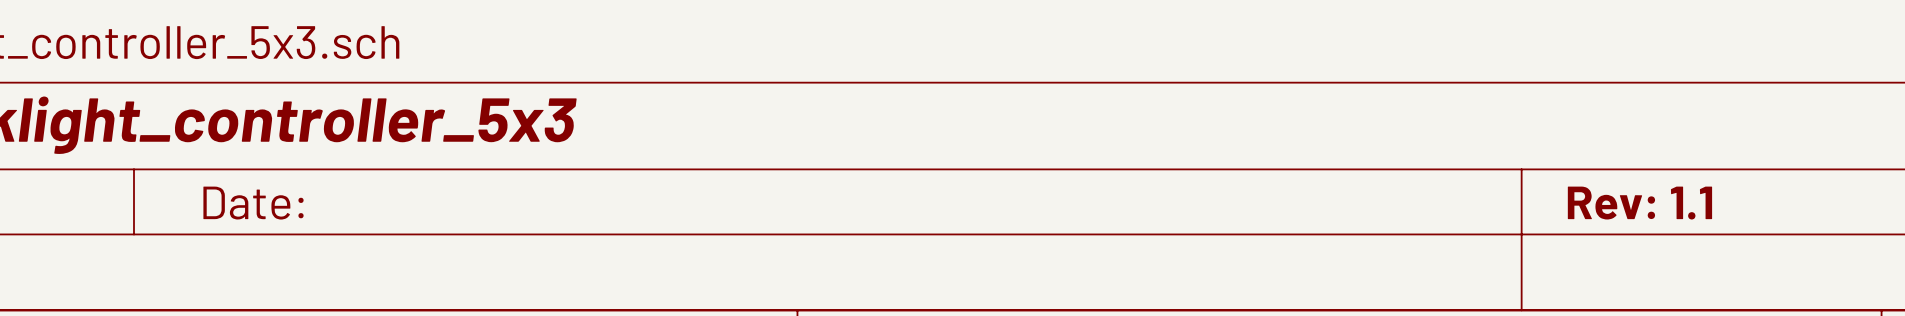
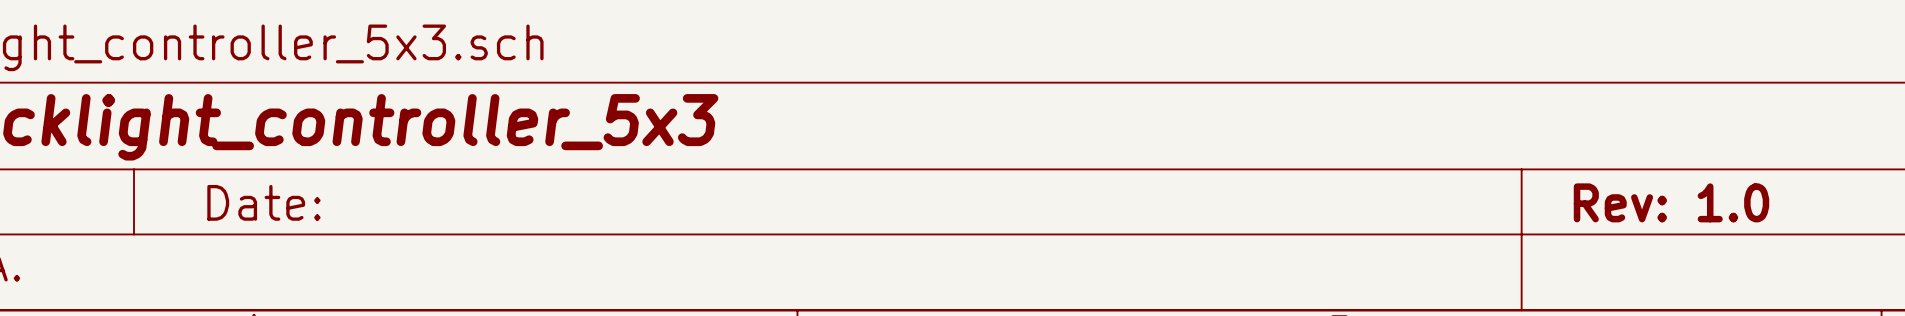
title block: Rev: 1.1 (1639, 203) -> Rev: 1.0 (1671, 202)

